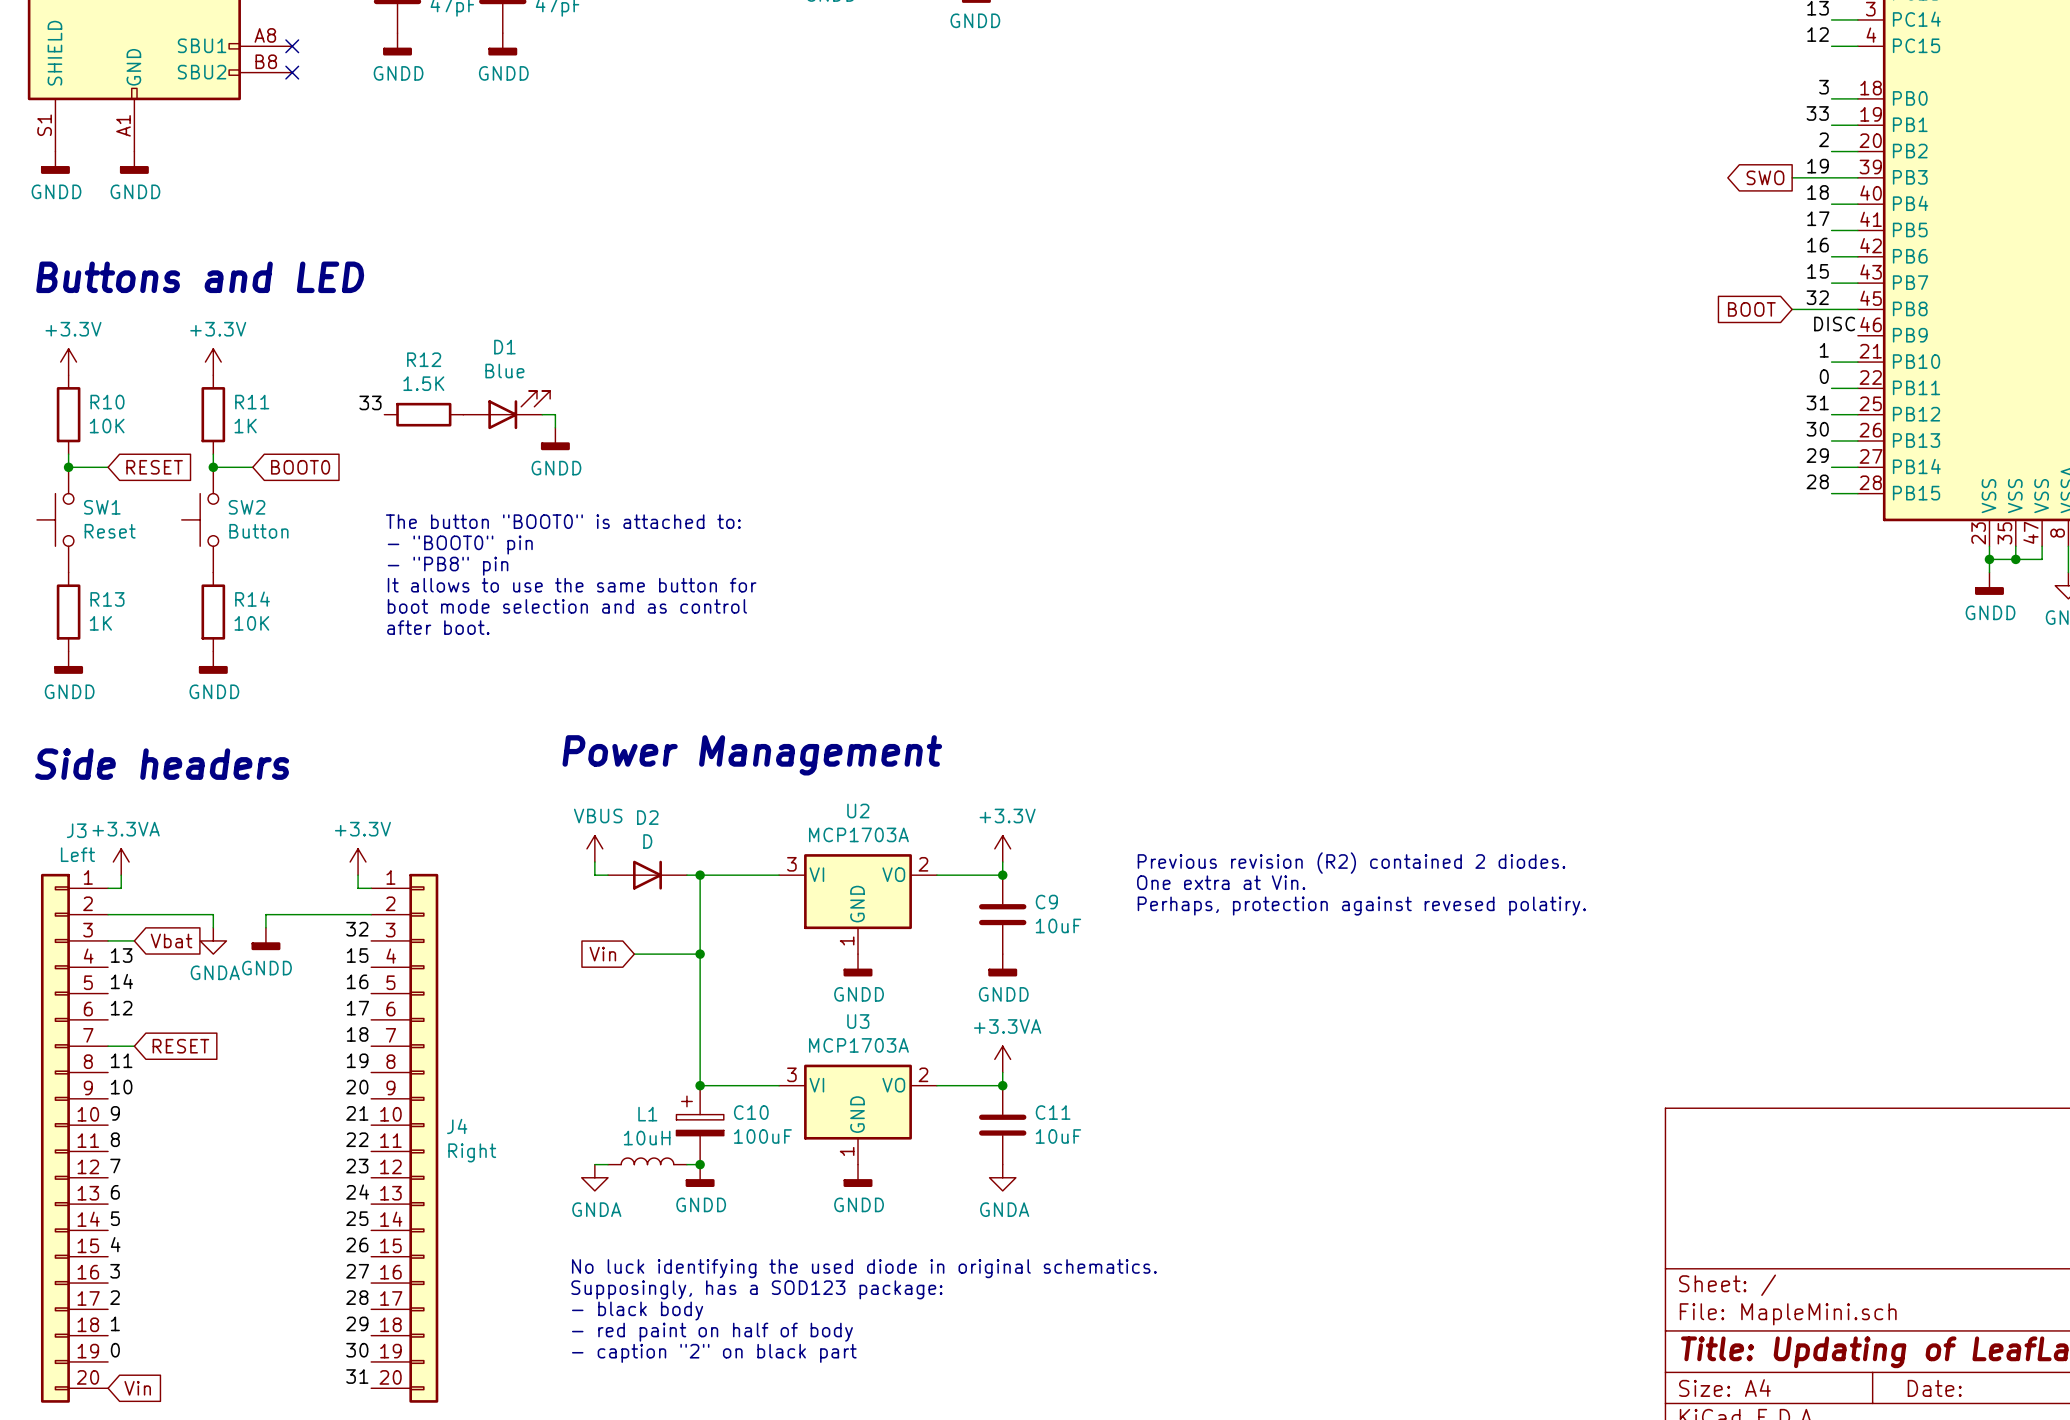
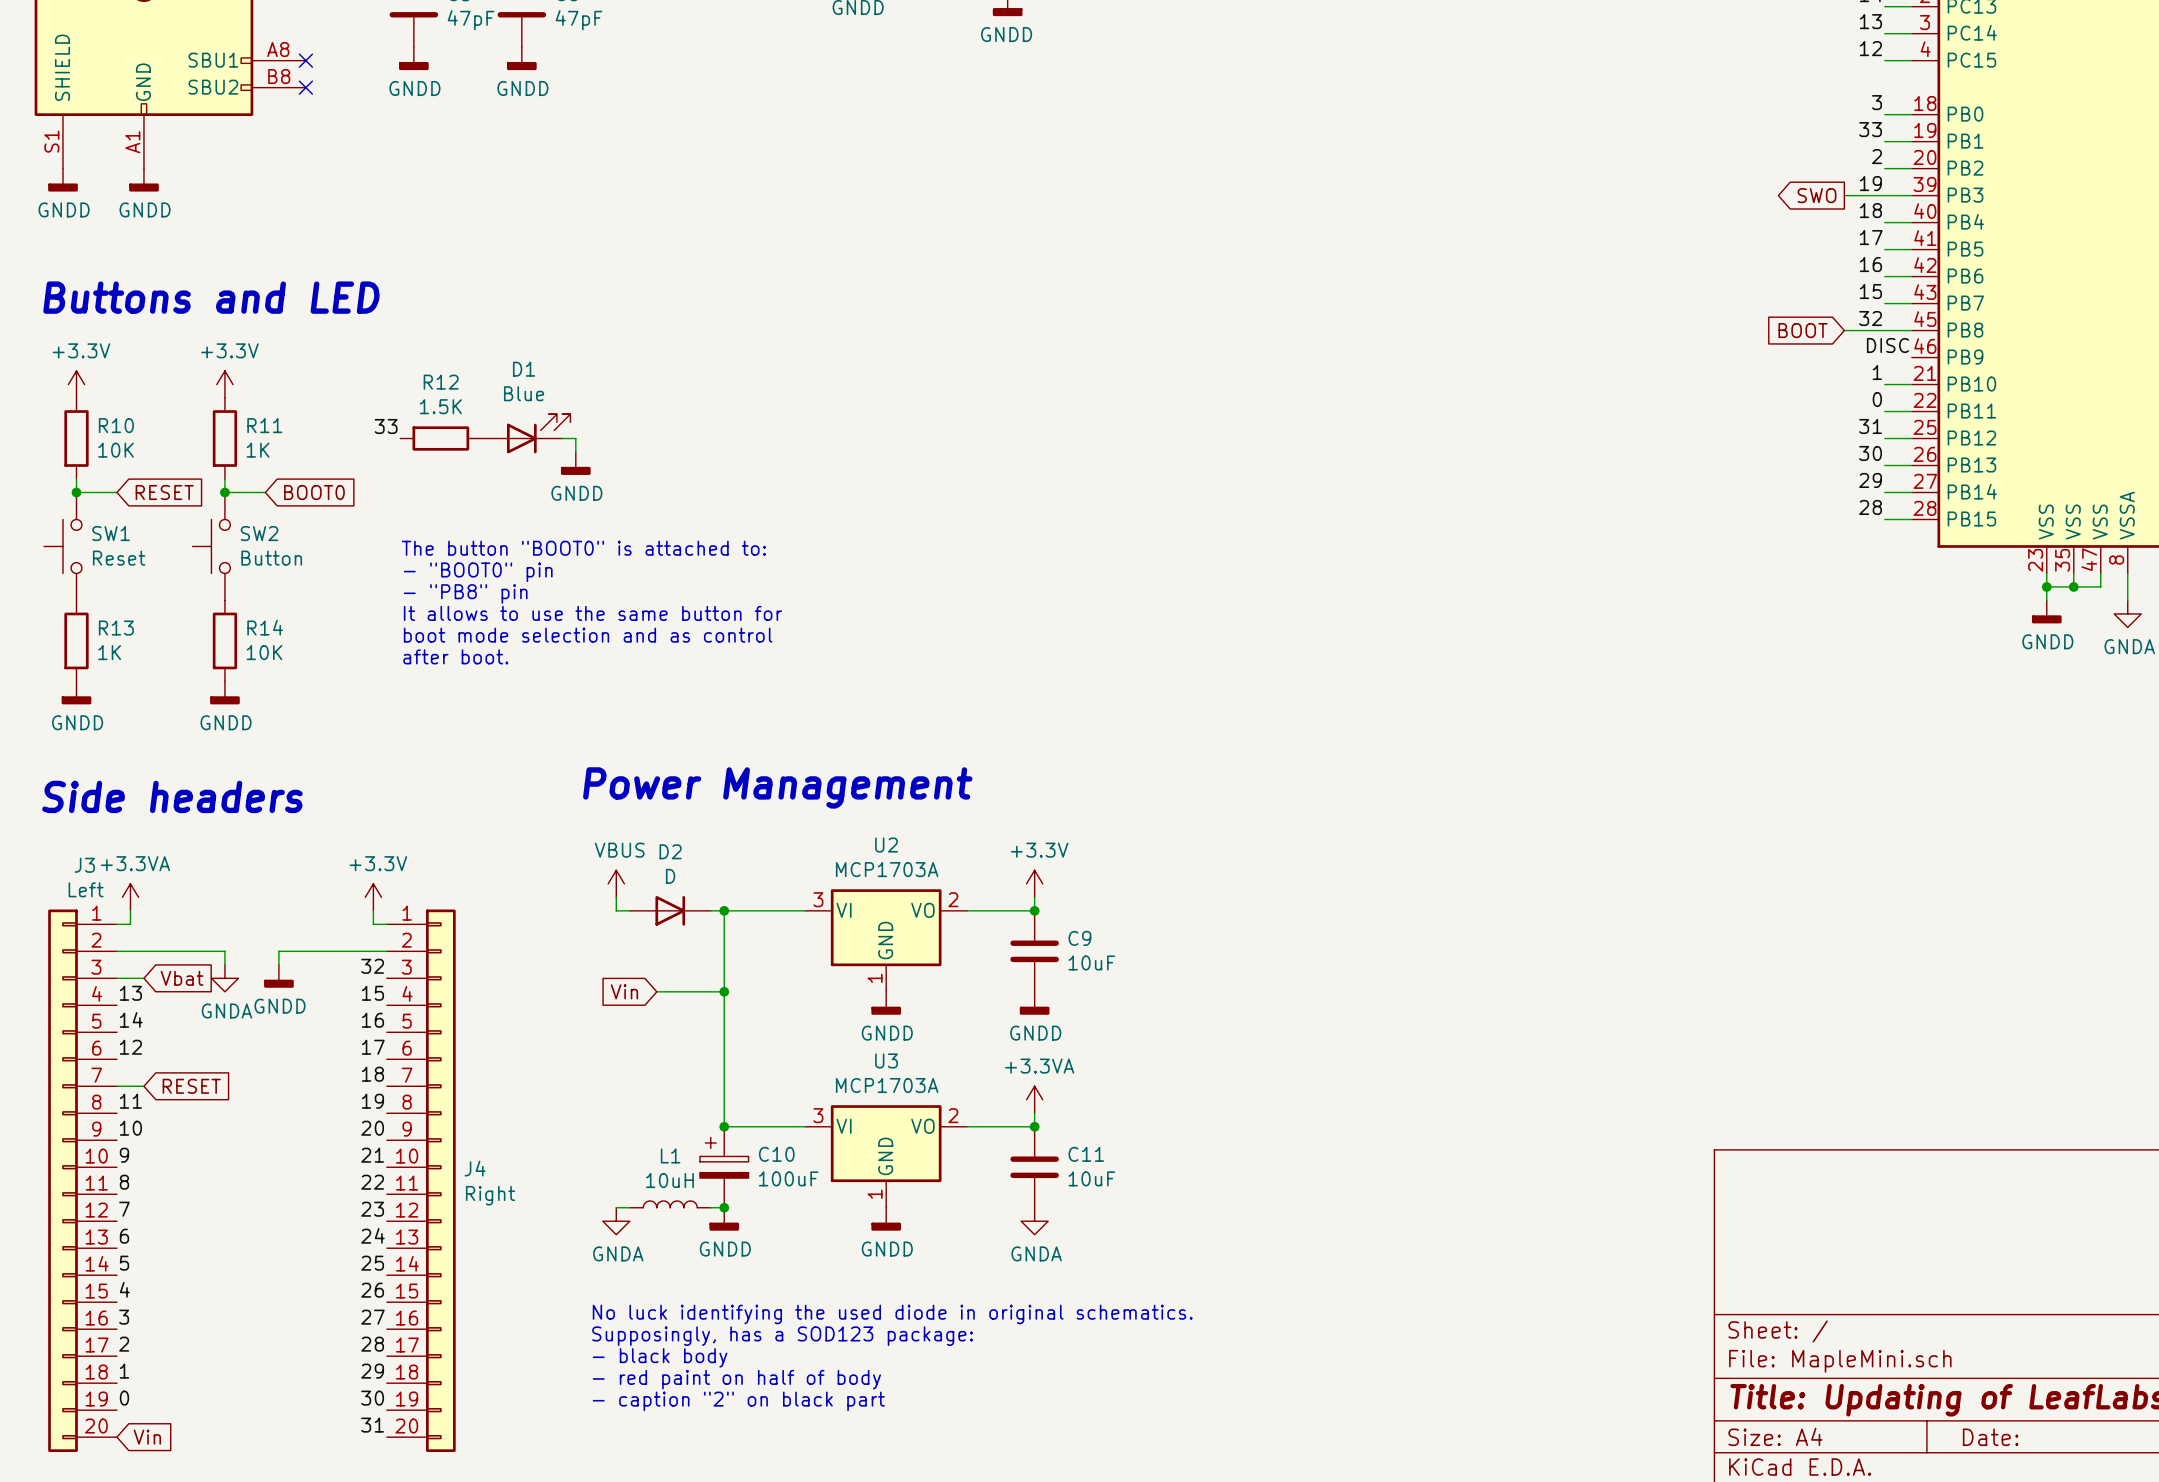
text: Previous revision (R2) contained 2 diodes. (1351, 863) -> none
text: One extra at Vin. (1221, 882) -> none
text: Perhaps, protection against revesed polatiry. (1361, 906) -> none

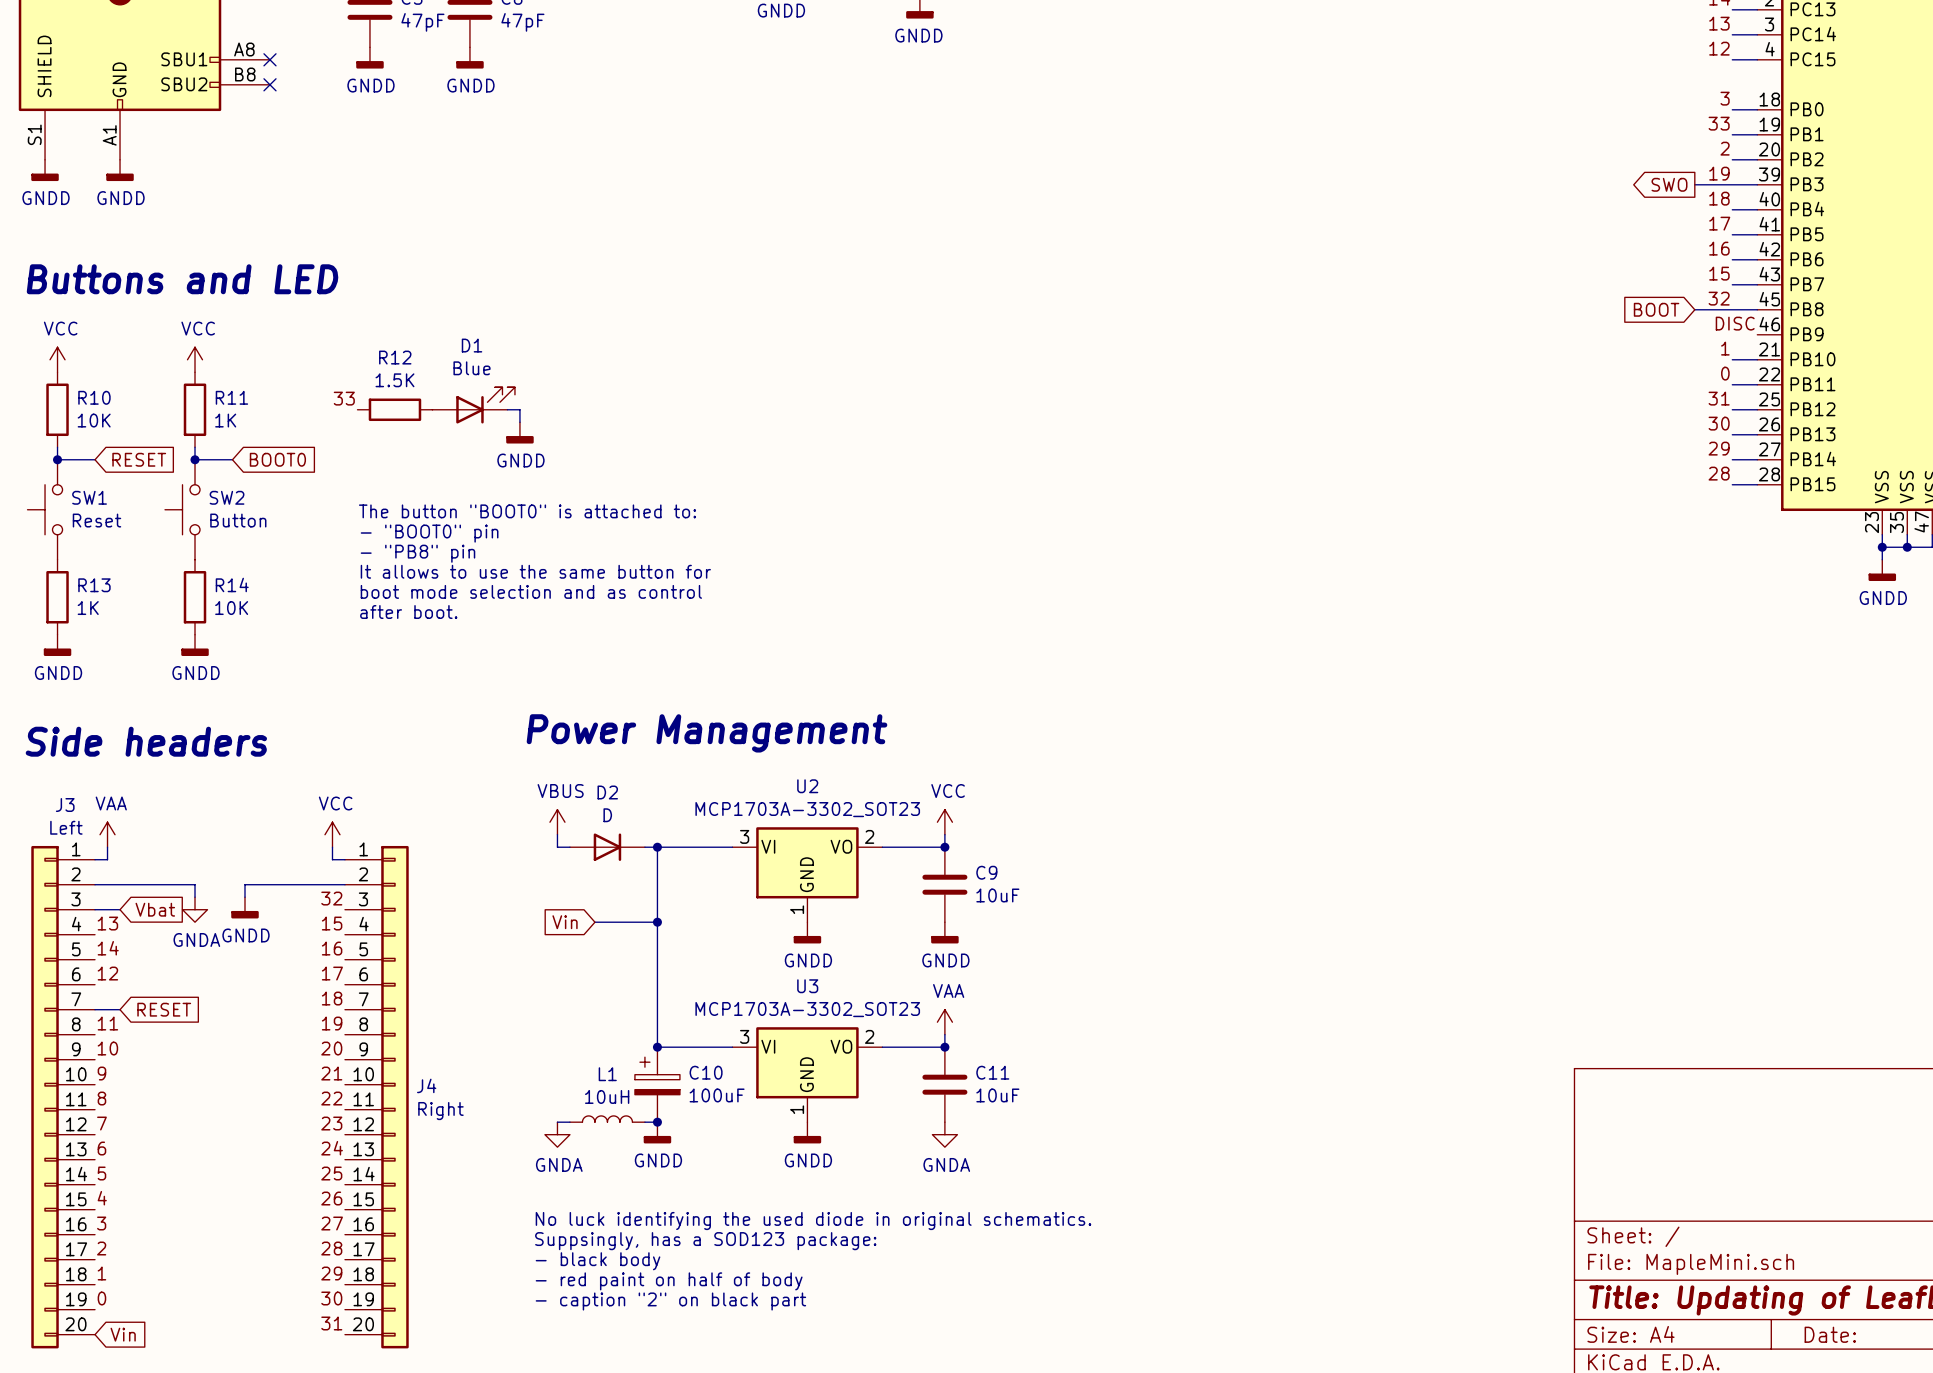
power symbol: +3.3V (76, 384) -> VCC (57, 359)
power symbol: +3.3V (224, 384) -> VCC (195, 359)
U2 value: MCP1703A (887, 869) -> MCP1703A-3302_SOT23 (807, 809)
power symbol: +3.3V (1034, 883) -> VCC (944, 822)
power symbol: +3.3VA (130, 897) -> VAA (107, 834)
power symbol: +3.3V (373, 897) -> VCC (332, 834)
U3 value: MCP1703A (887, 1085) -> MCP1703A-3302_SOT23 (807, 1009)
power symbol: +3.3VA (1034, 1099) -> VAA (944, 1022)
text: Supposingly, has a SOD123 package: (782, 1336) -> Suppsingly, has a SOD123 package: (705, 1241)

